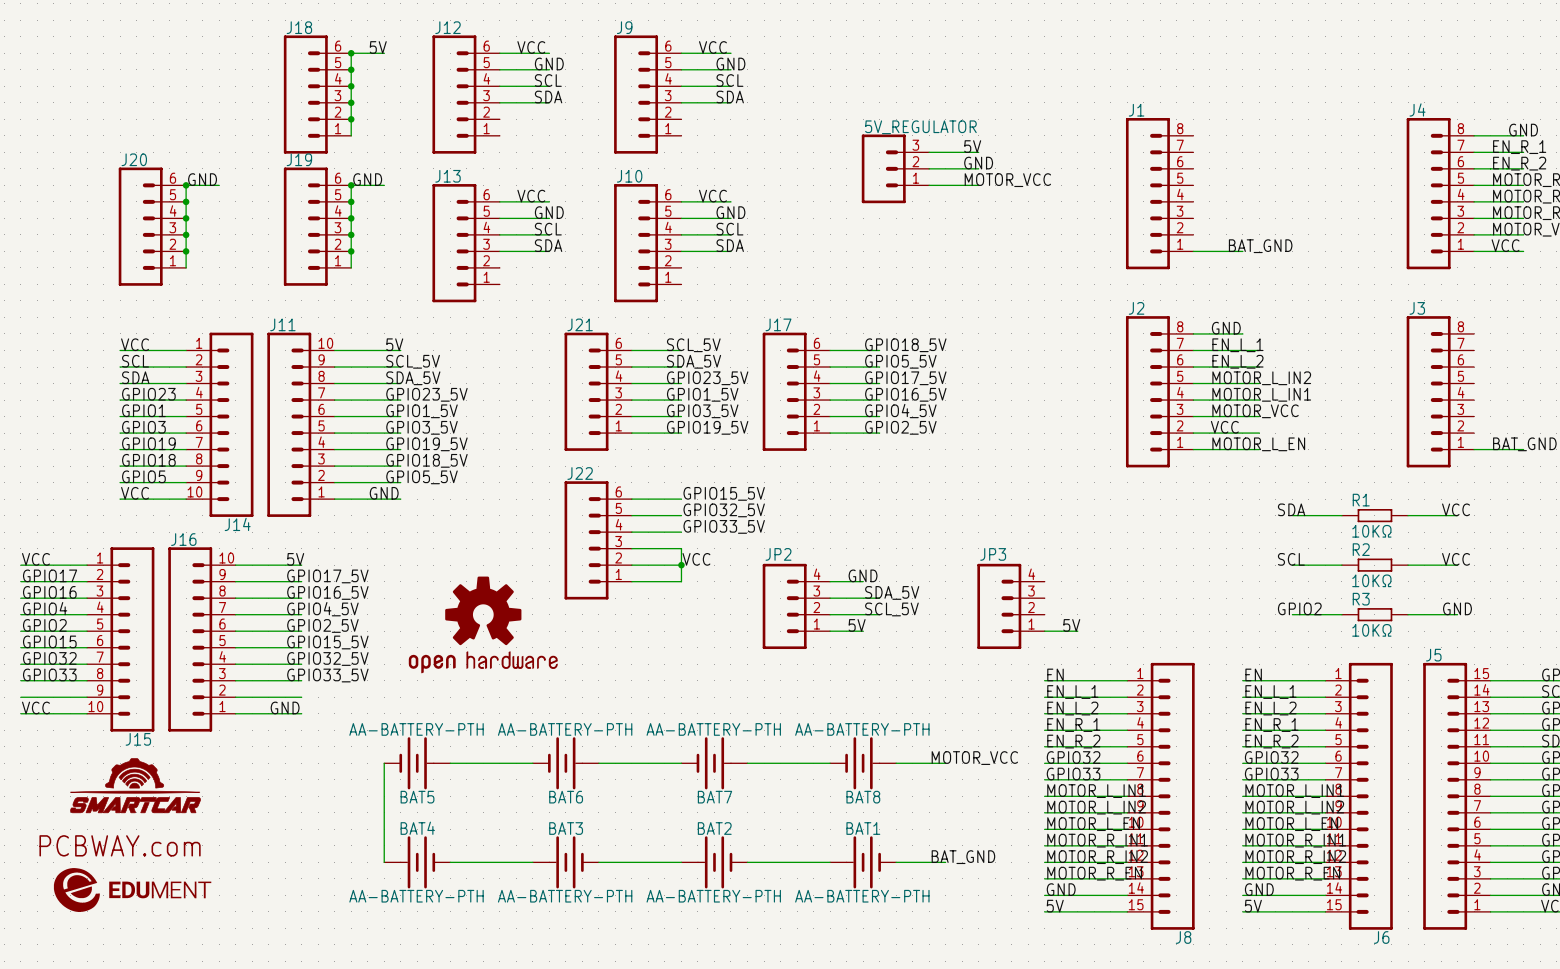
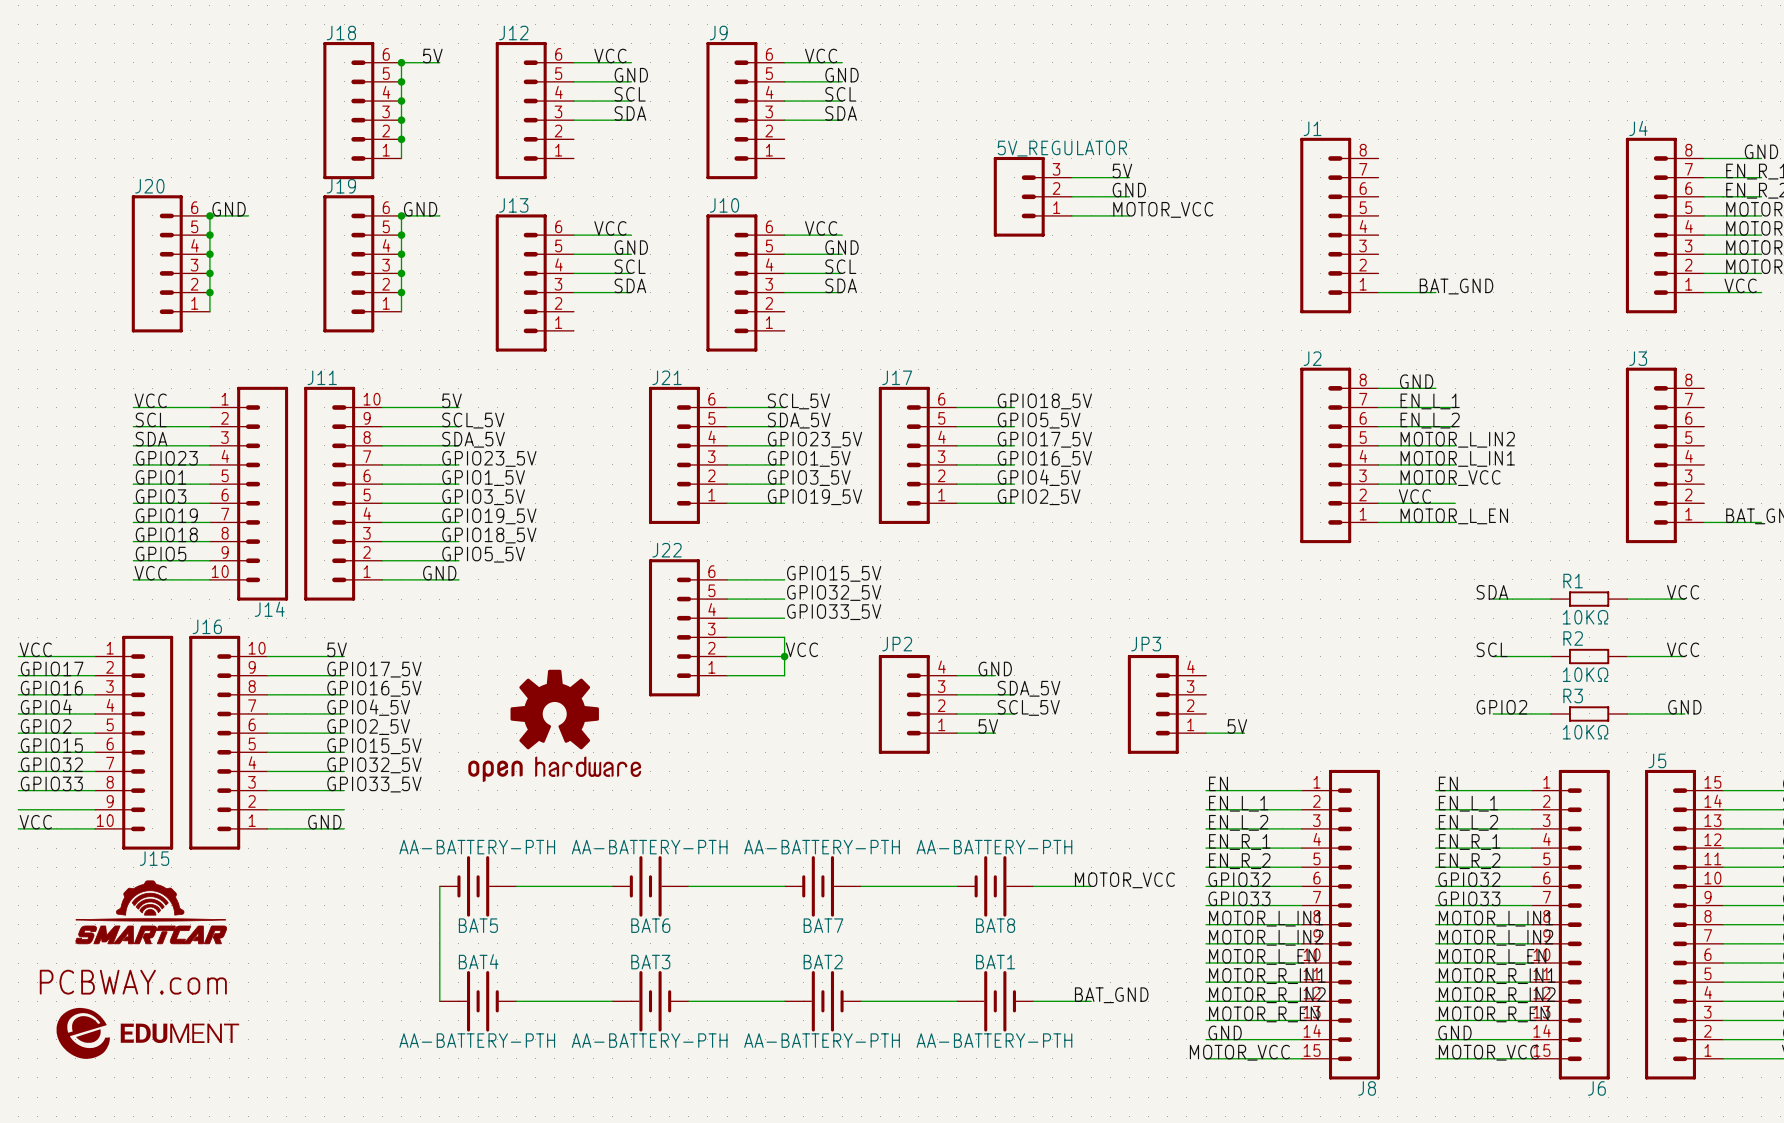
label: 5V (1055, 906) -> none
label: none -> MOTOR_VCC (1239, 1052)
label: 5V (1253, 906) -> MOTOR_VCC (1488, 1052)

